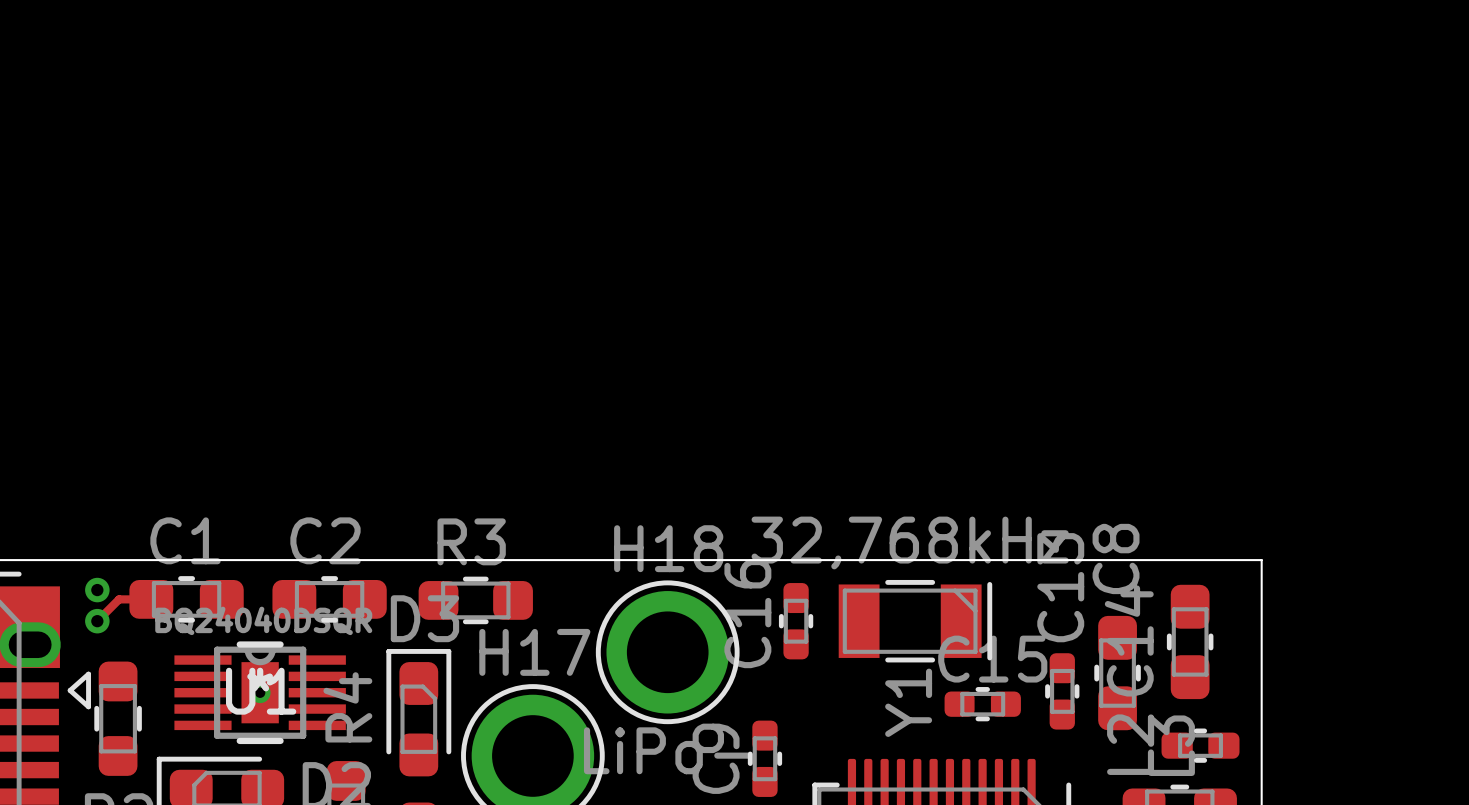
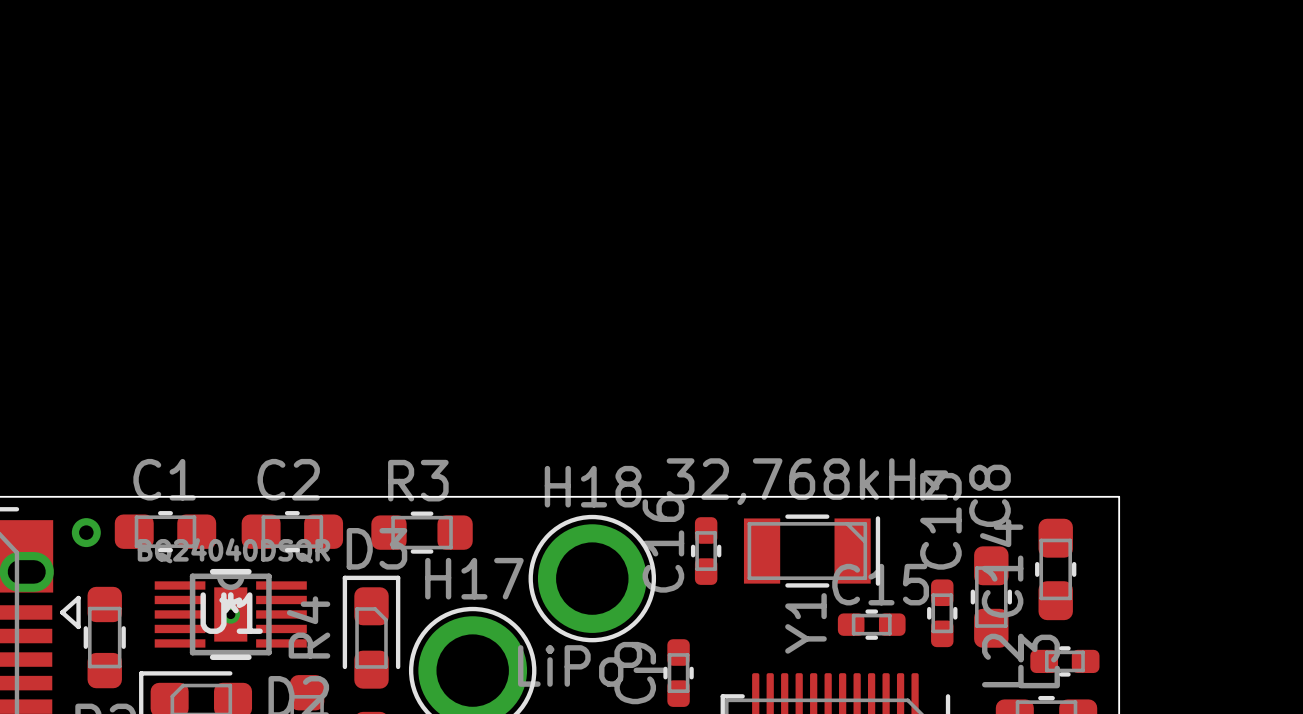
via: (97, 590) -> none
track: (151, 599) (119, 599) (97, 621) -> none
via: none -> (86, 532)
via: (97, 621) -> none

